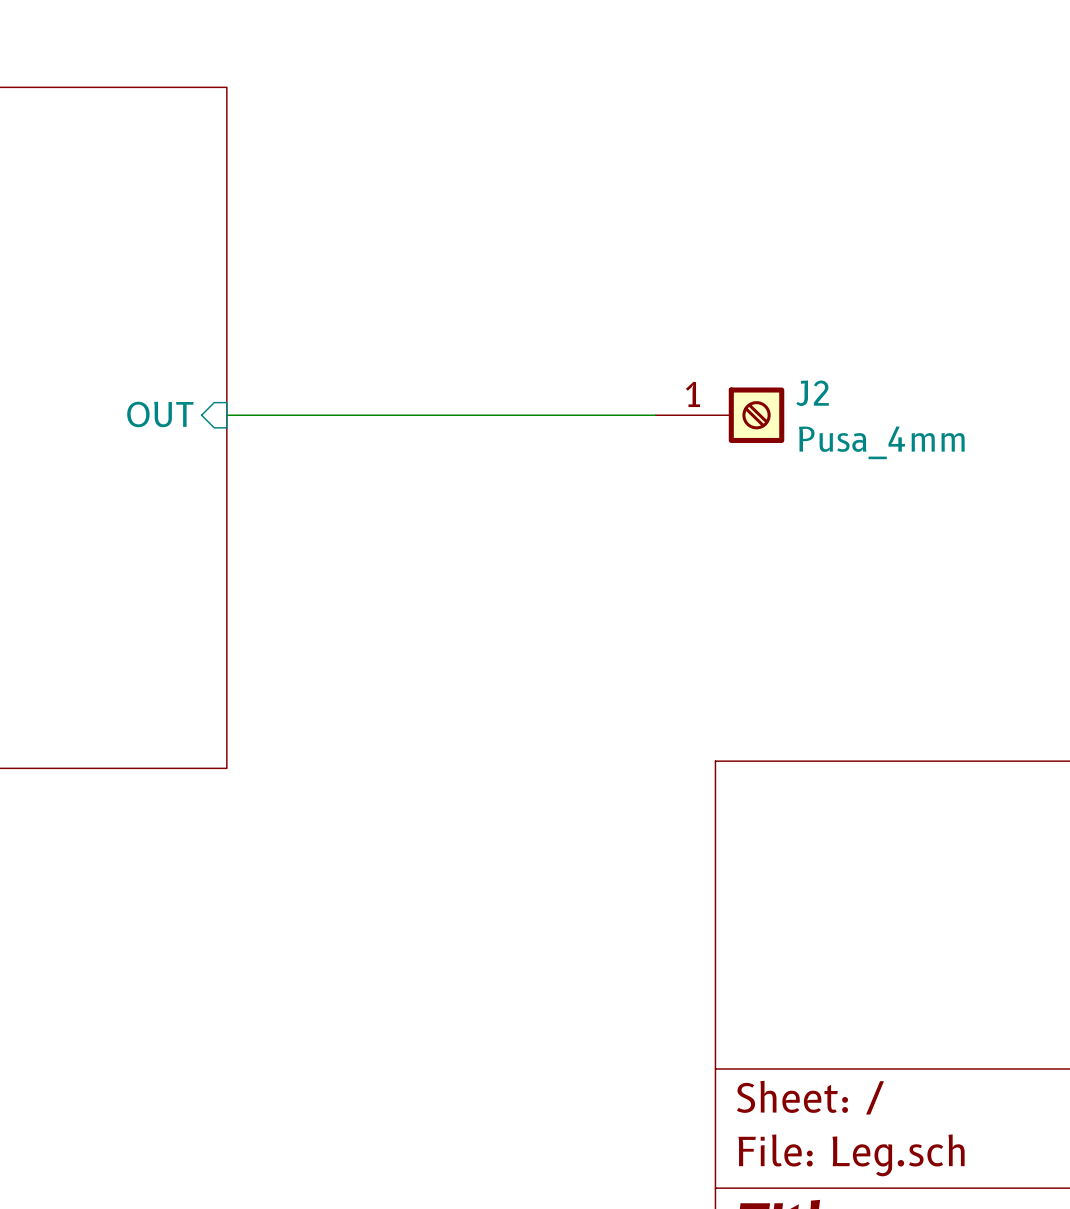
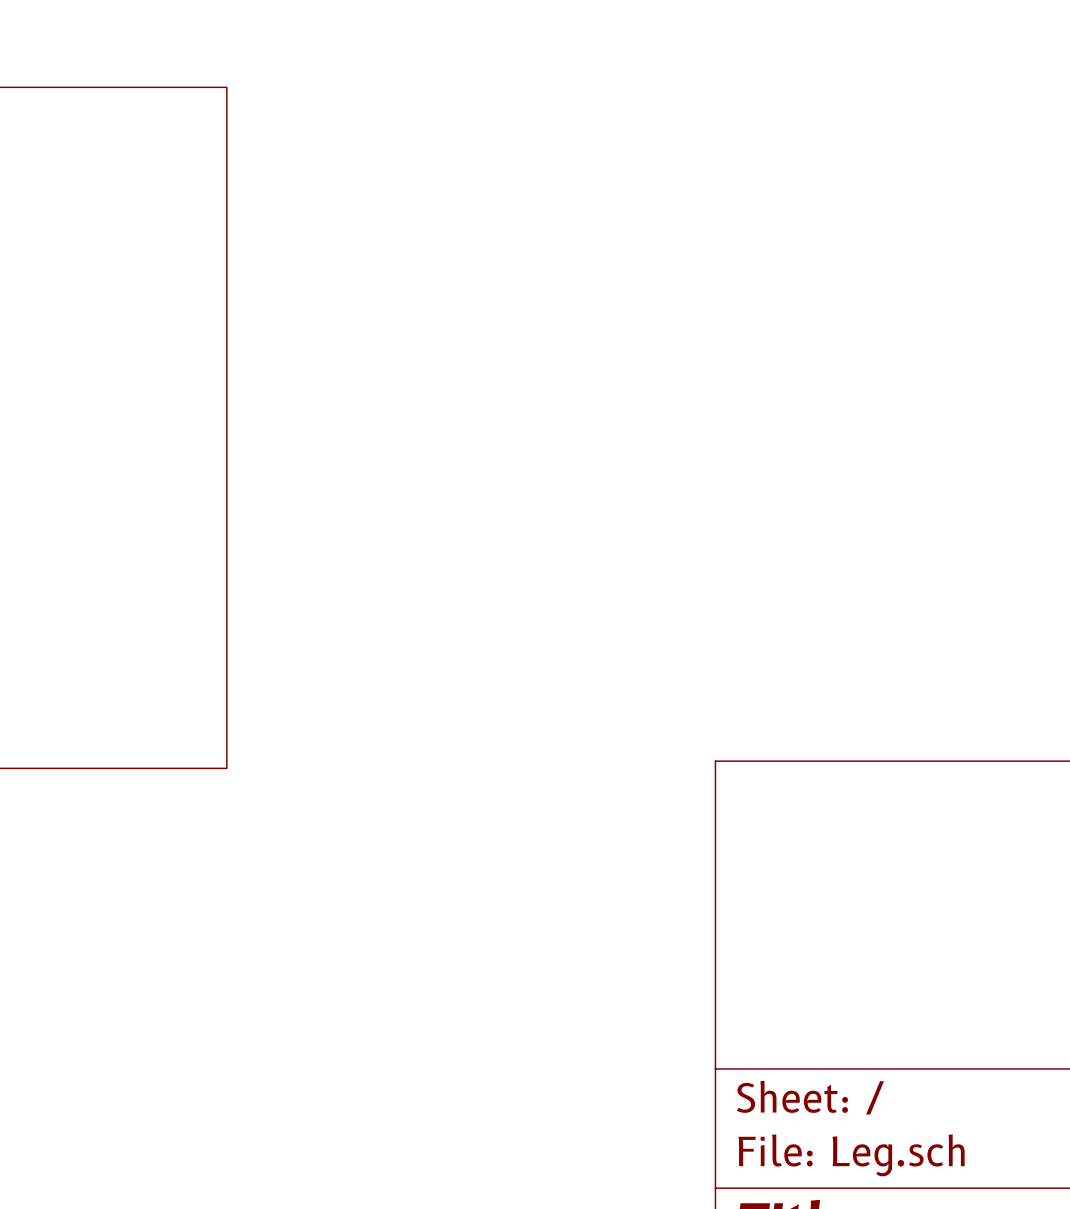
sheet pin: OUT (160, 414) -> none
wire: (226, 415) (655, 415) -> none
J2: Pusa_4mm (719, 415) -> none

